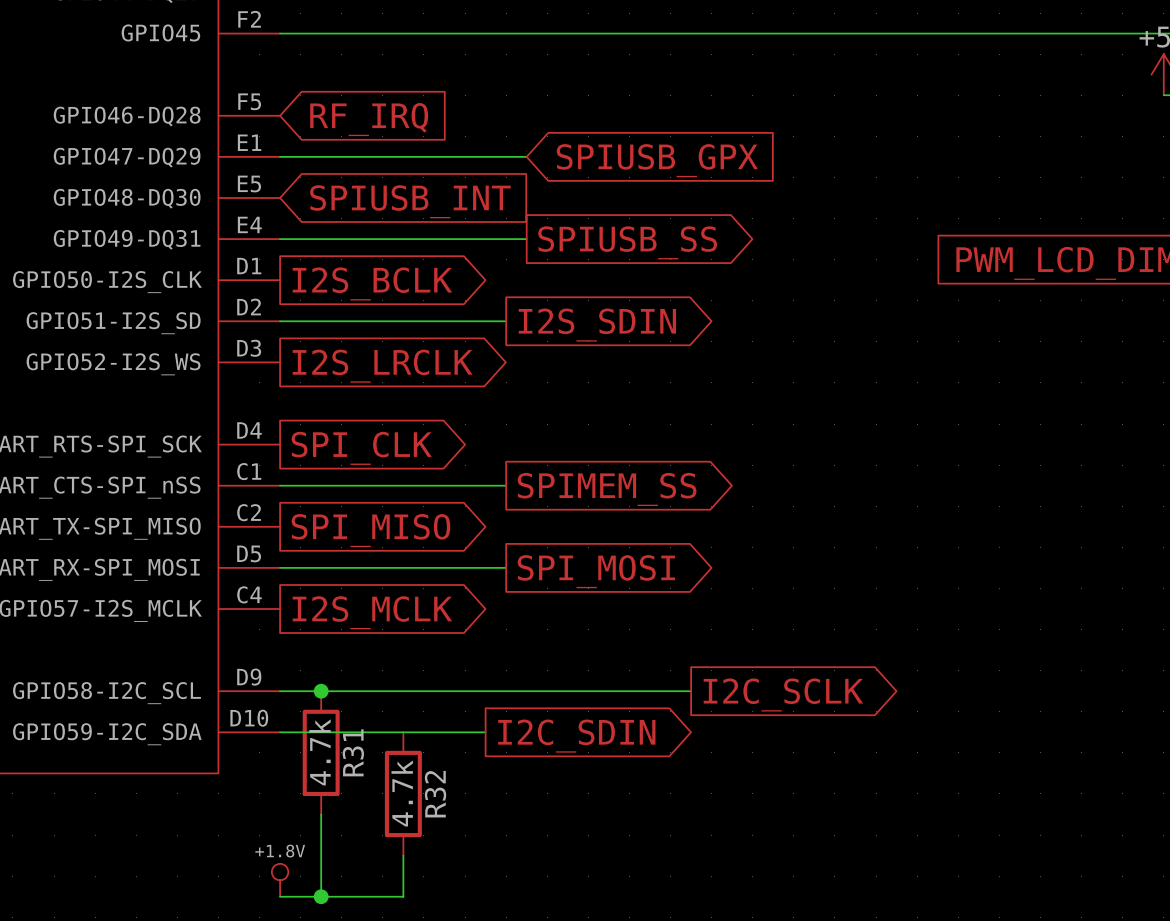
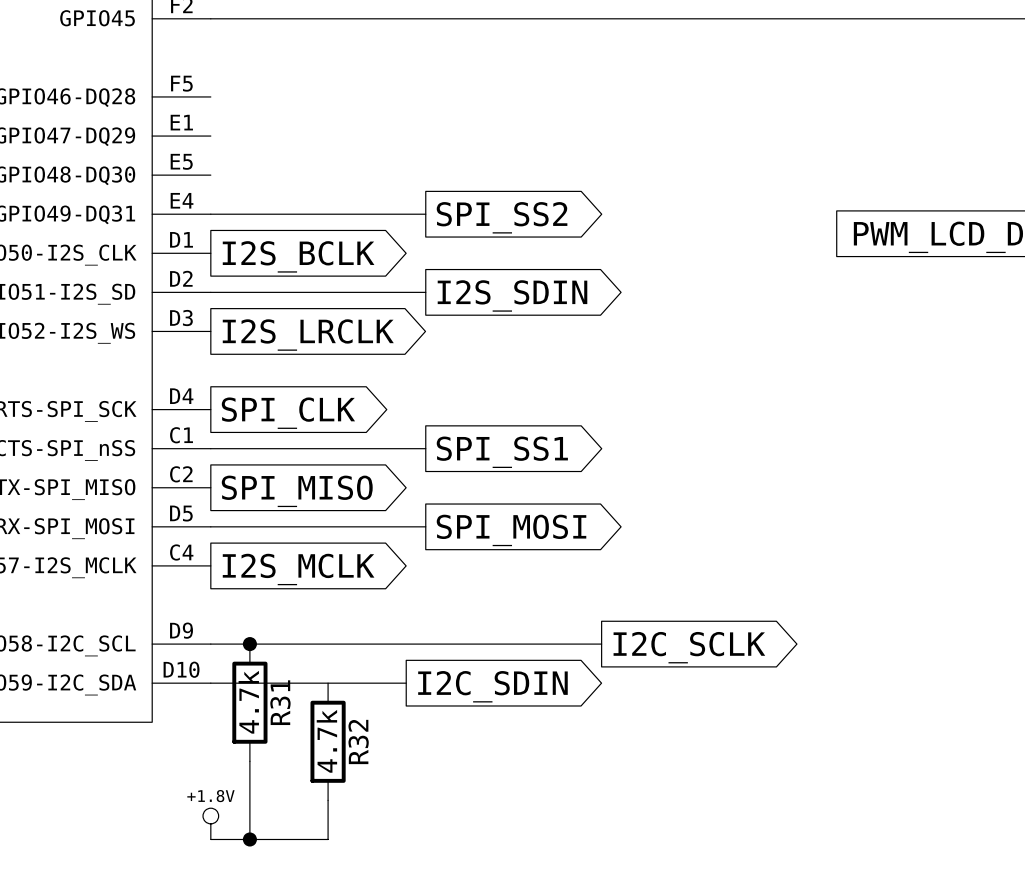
global label: RF_IRQ (369, 119) -> none
wire: (280, 156) (526, 156) -> none
global label: SPIUSB_GPX (657, 160) -> none
global label: SPIUSB_INT (410, 201) -> none
wire: (506, 239) (526, 239) -> none
global label: SPIUSB_SS (627, 242) -> SPI_SS2 (502, 217)
global label: SPIMEM_SS (607, 489) -> SPI_SS1 (502, 452)

